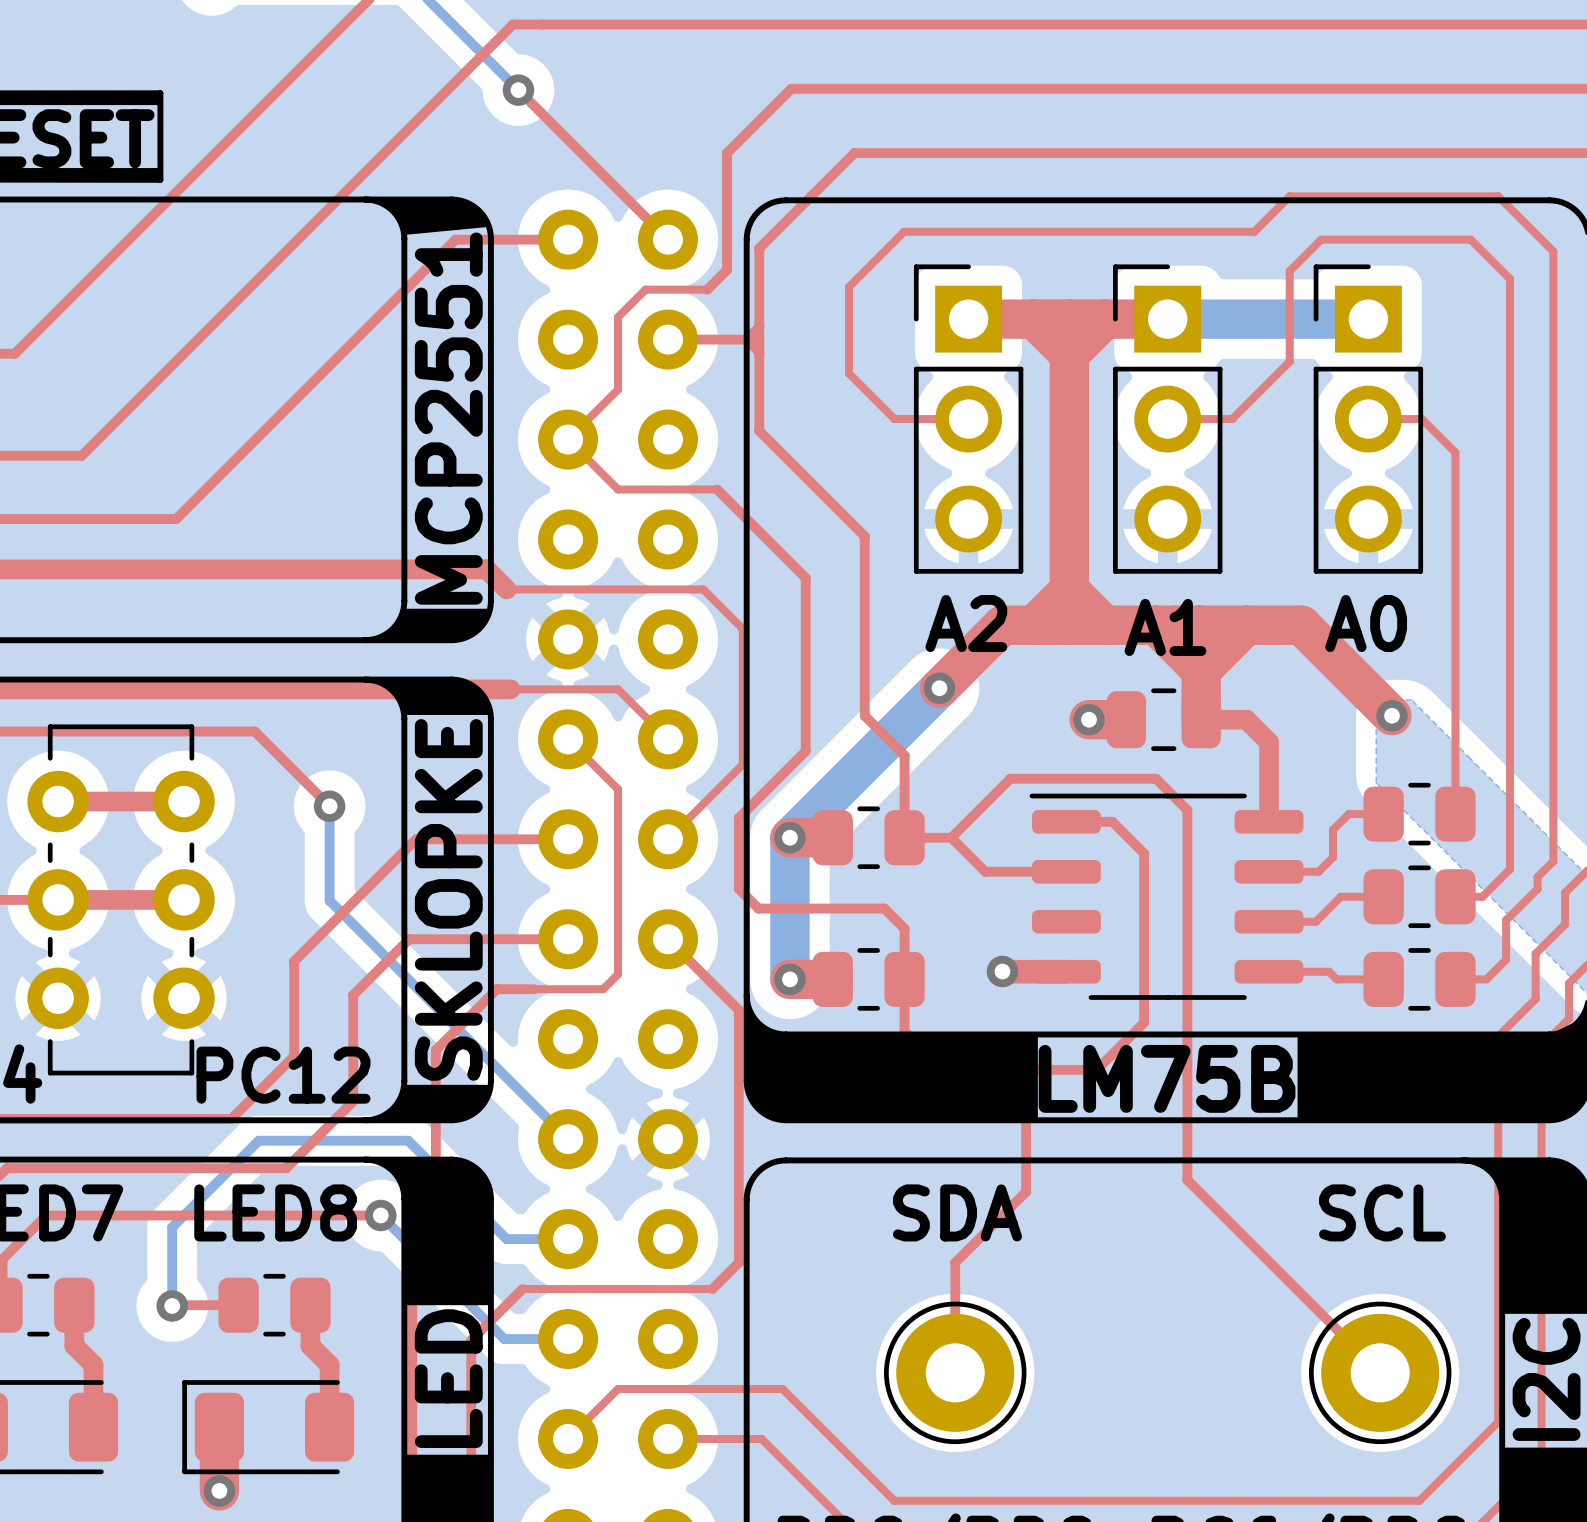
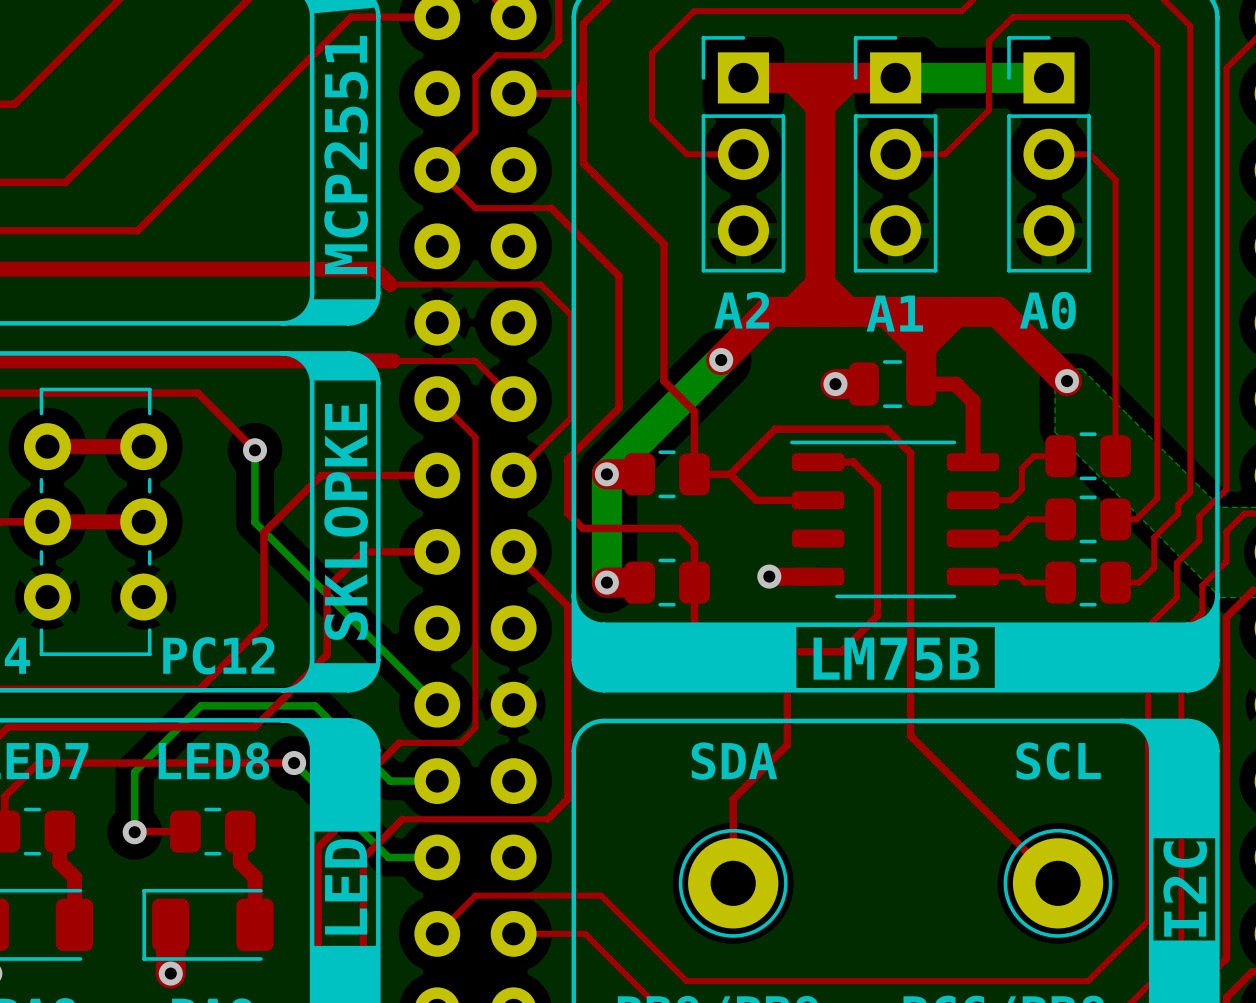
top track: (341, 914) (294, 961) (294, 1056) (231, 1119) -> (264, 532) (264, 624) (199, 689) (179, 689)
top track: (471, 939) (409, 939) (353, 995) (353, 1101) (286, 1168) -> (363, 551) (327, 588) (327, 654) (255, 726) (221, 726)
top track: (618, 974) (603, 989) (496, 989) (435, 1050) (435, 1231) (412, 1254) (412, 1325) -> (475, 578) (475, 727) (460, 742) (399, 742) (354, 788) (354, 811) (318, 847)

